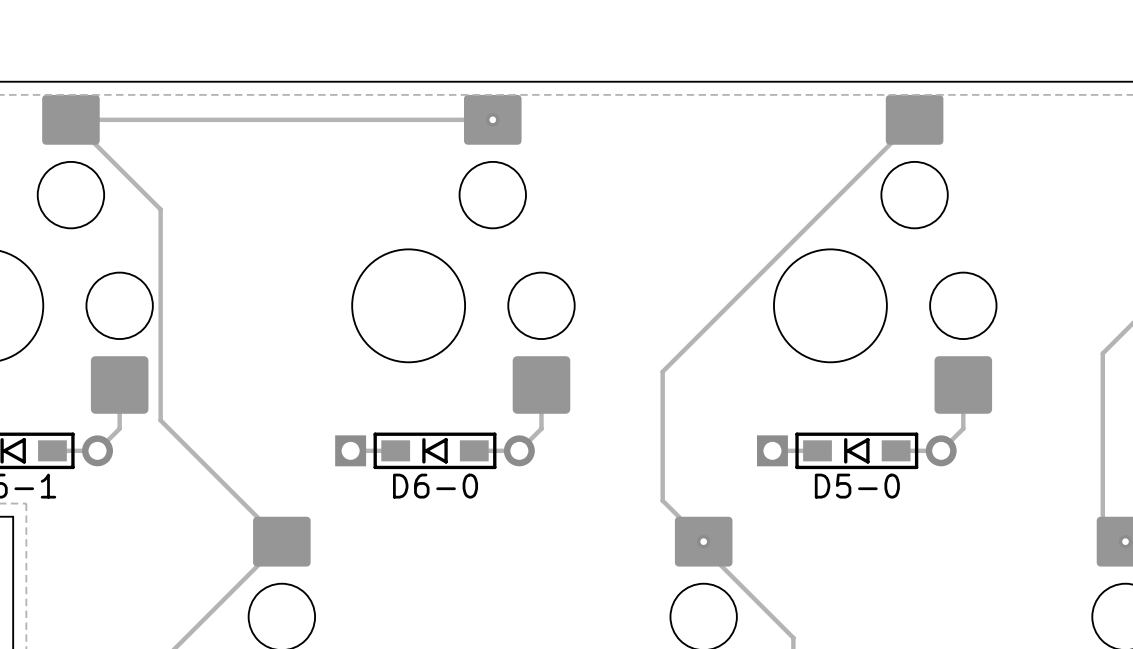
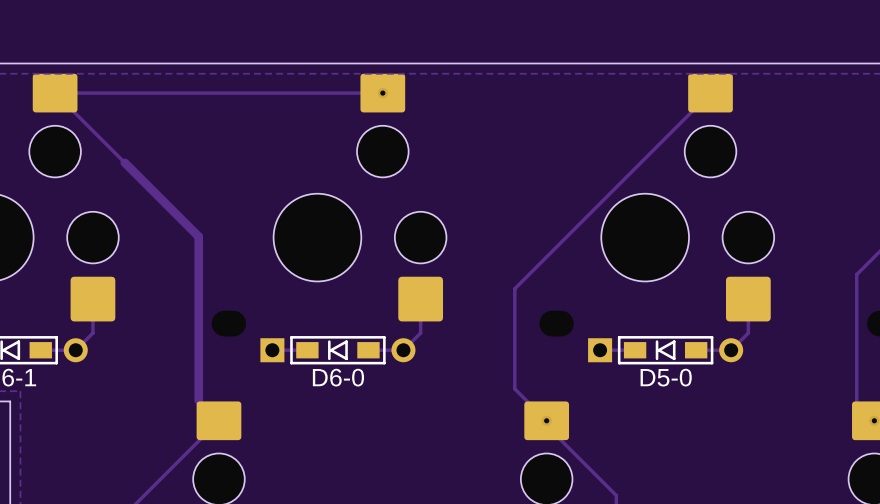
track: (160, 209) (160, 420) (255, 515) -> (124, 162) (198, 236) (198, 400)

